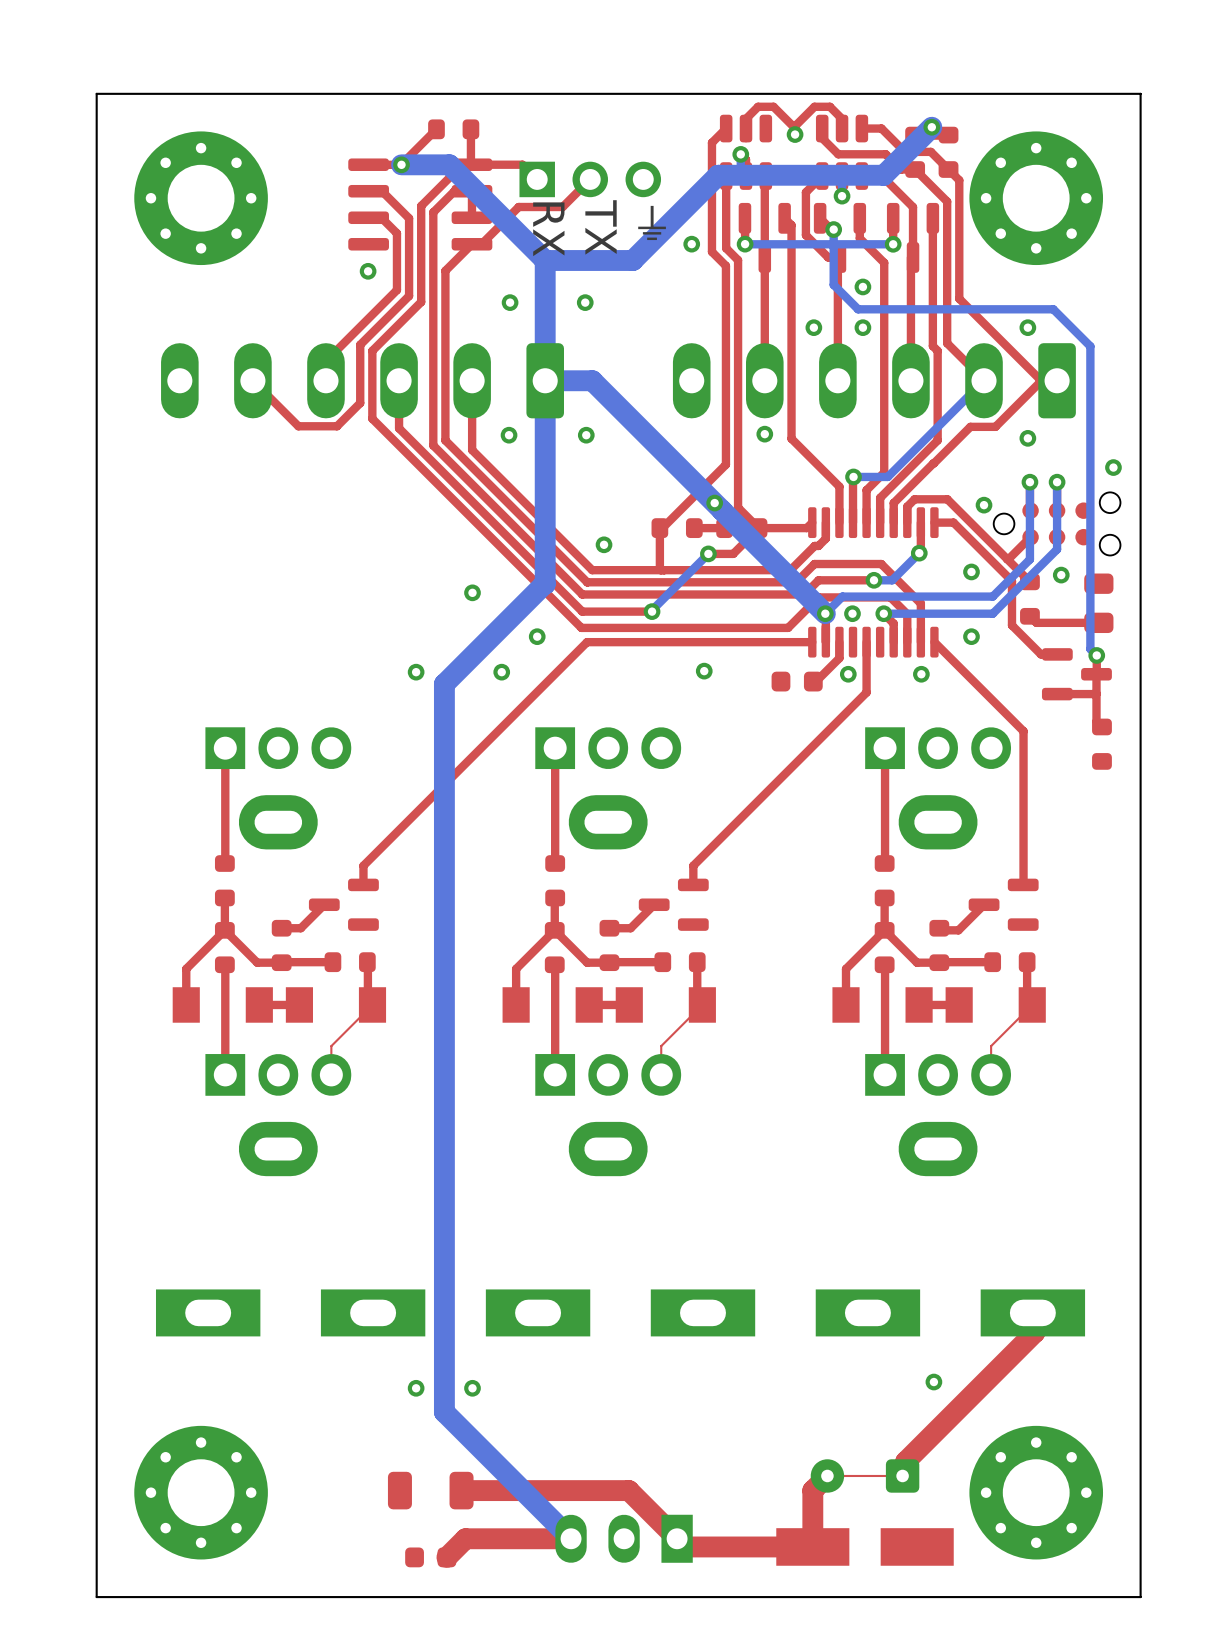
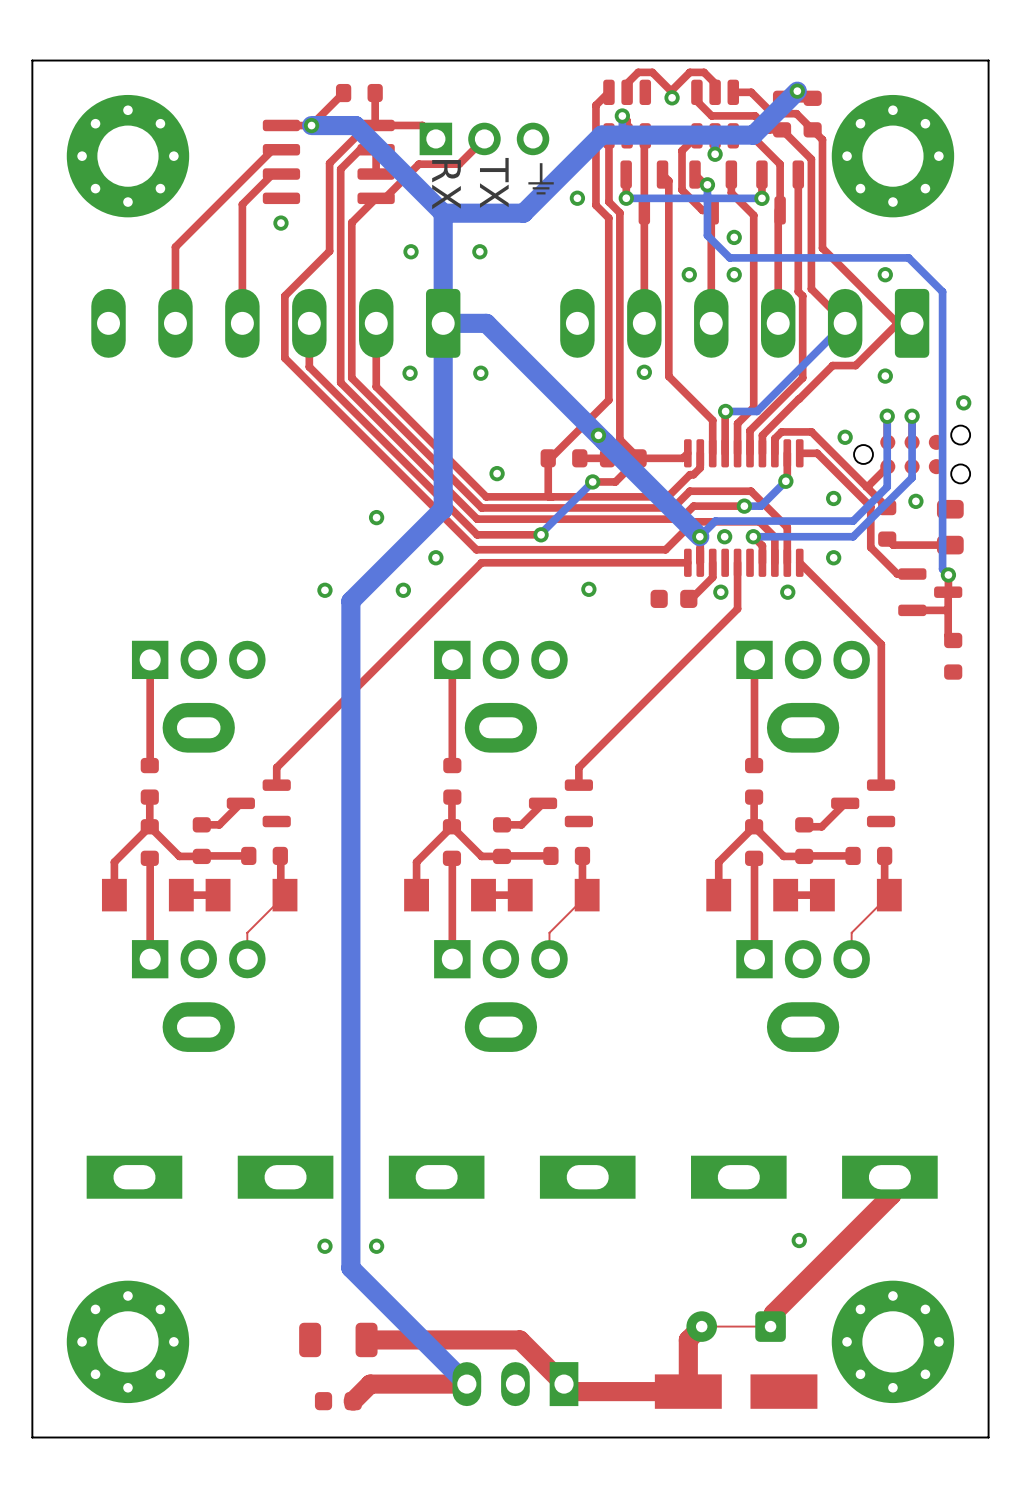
top track: (368, 191) (381, 191) (409, 218) (409, 295) (360, 344) (360, 403) (337, 426) (298, 426) (252, 380) -> (281, 149) (272, 149) (175, 247) (175, 323)
top track: (368, 217) (381, 217) (396, 233) (396, 290) (325, 361) -> (281, 174) (272, 174) (242, 204) (242, 305)

